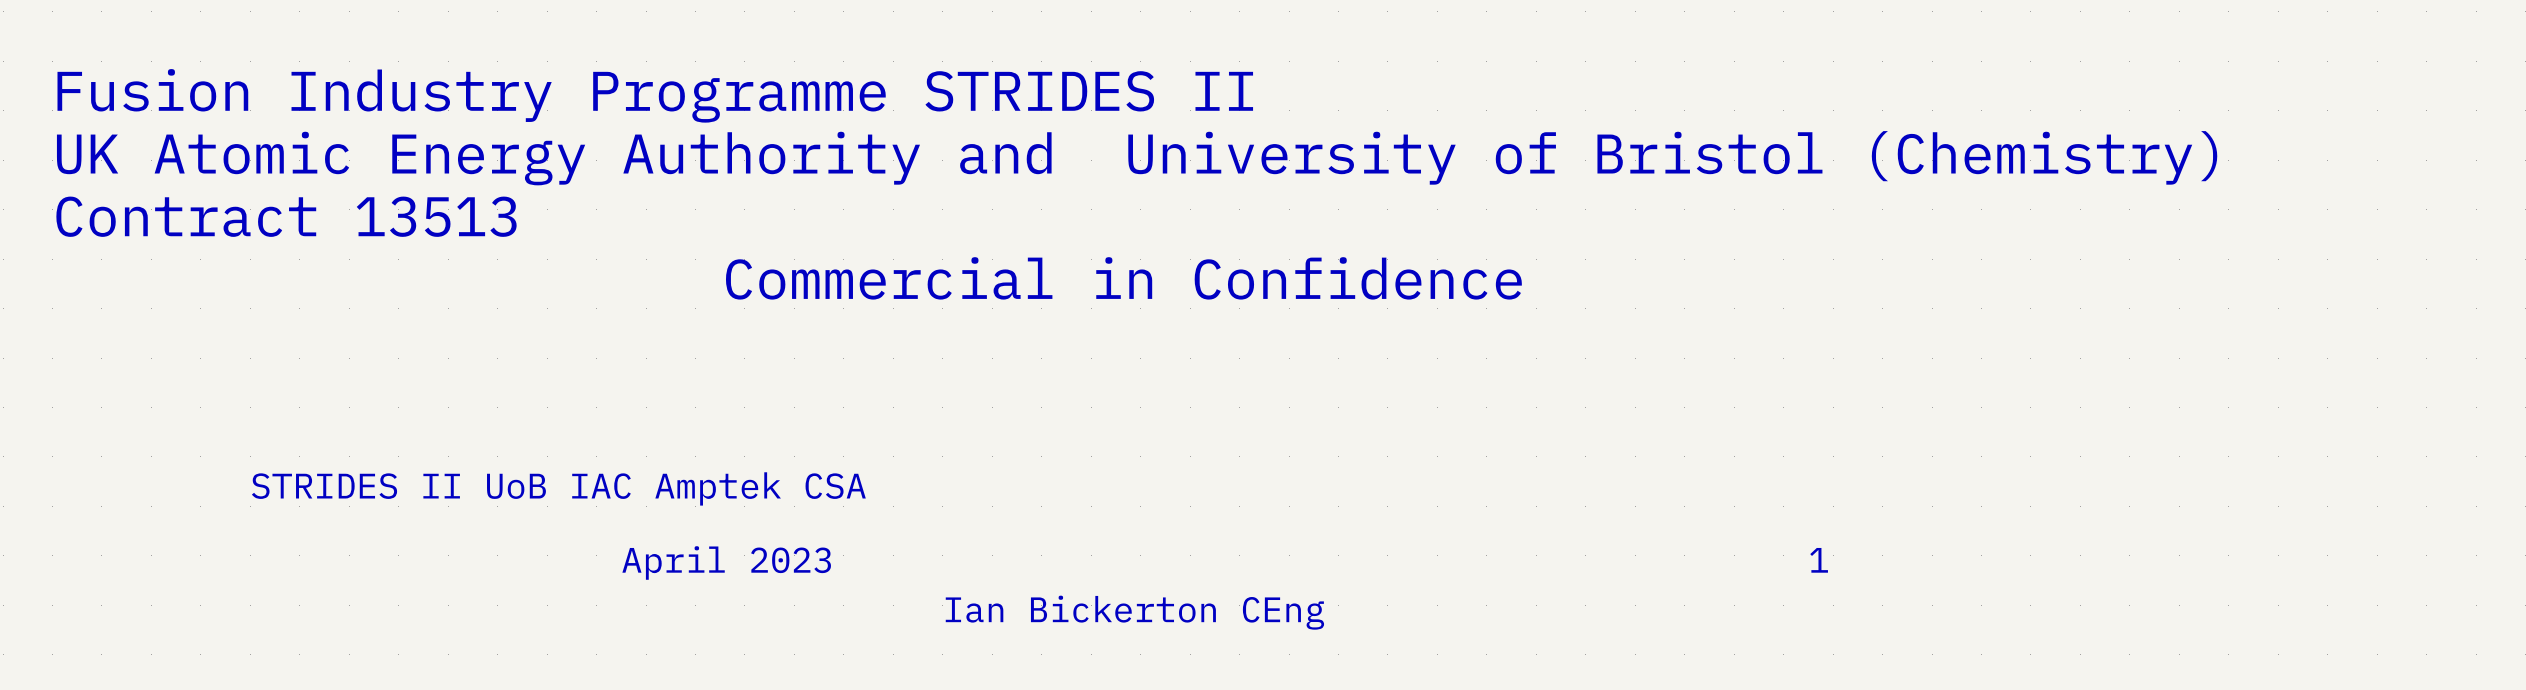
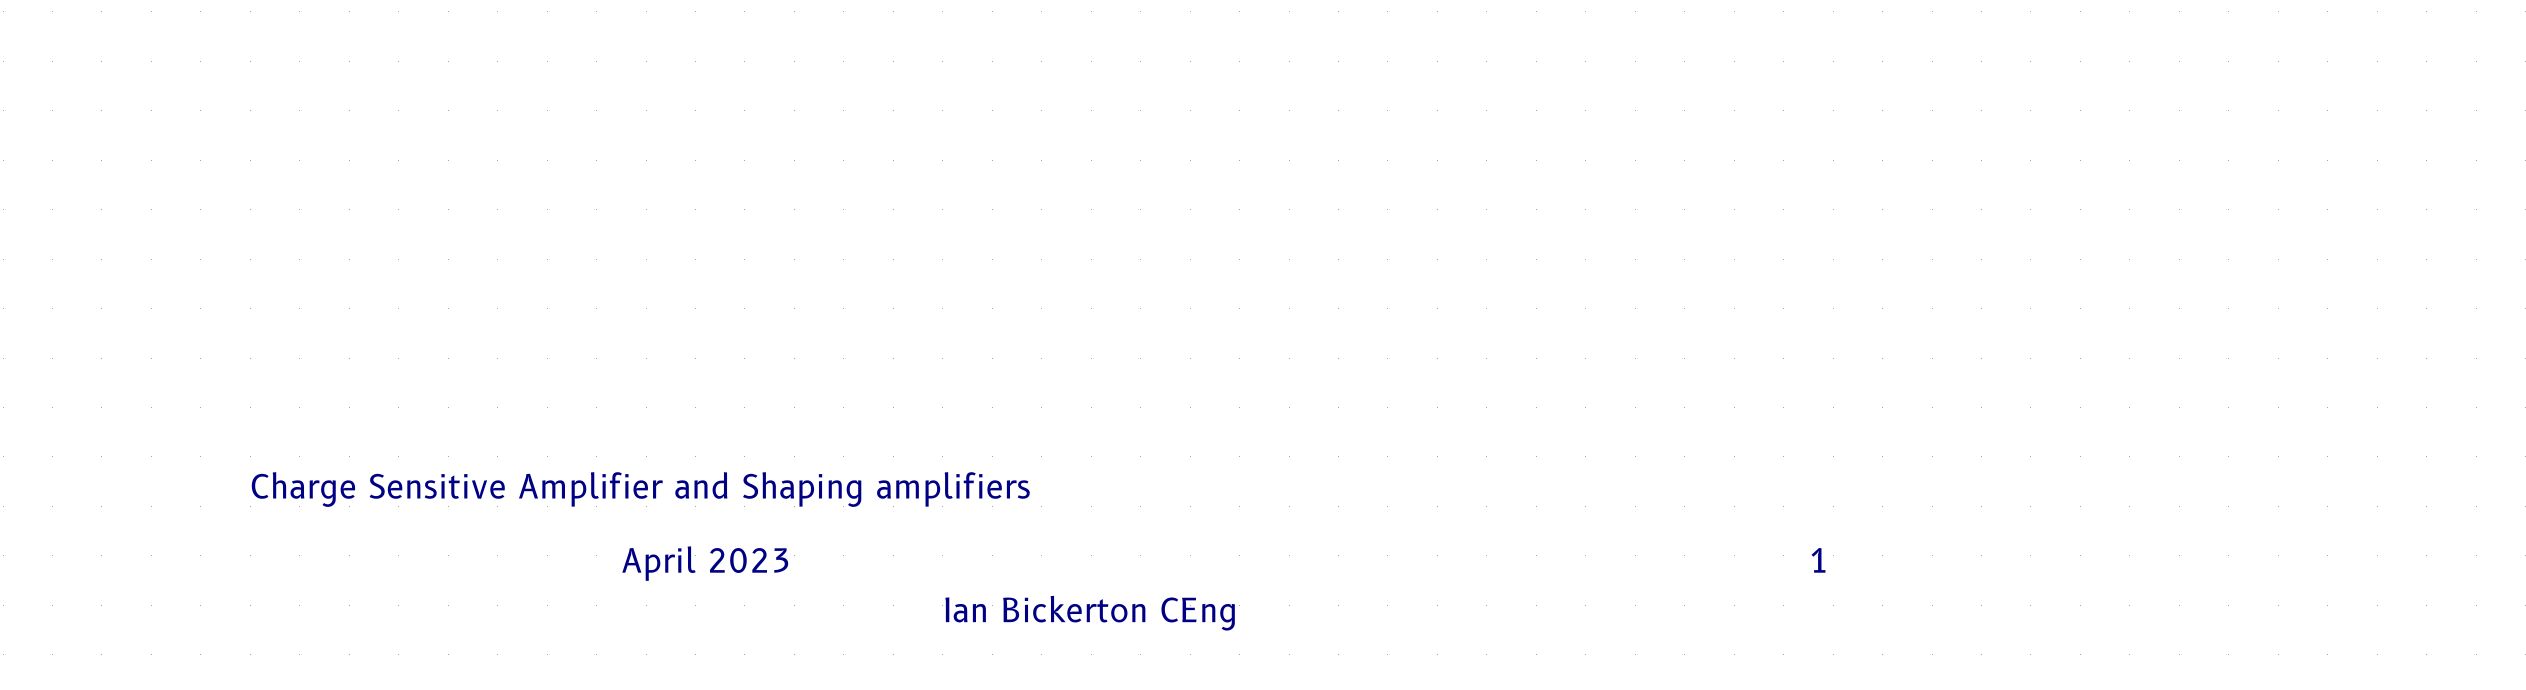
text: Fusion Industry Programme STRIDES II (655, 95) -> none
text: UK Atomic Energy Authority and University of Bristol (Chemistry) (1137, 158) -> none
text: Contract 13513 (286, 216) -> none
text: Commercial in Confidence (1123, 278) -> none
text: STRIDES II UoB IAC Amptek CSA (558, 488) -> Charge Sensitive Amplifier and Shaping amplifiers (640, 489)

